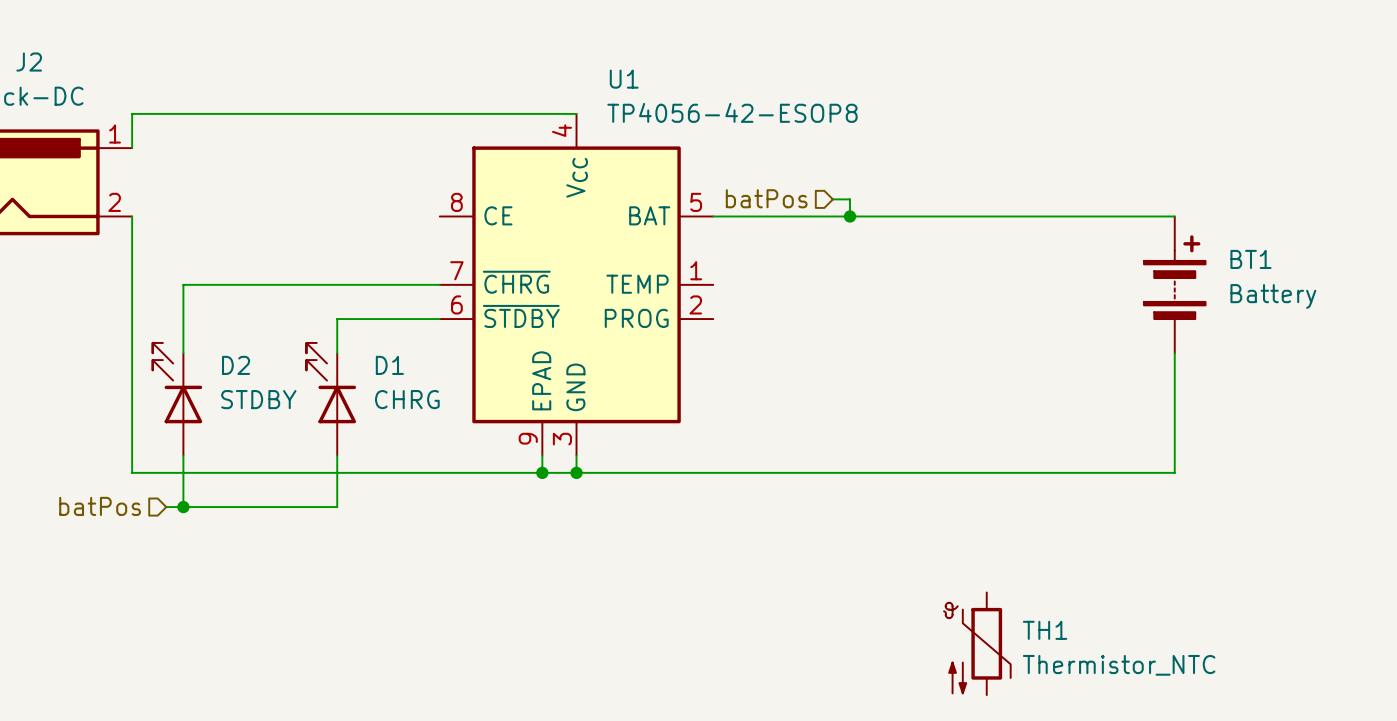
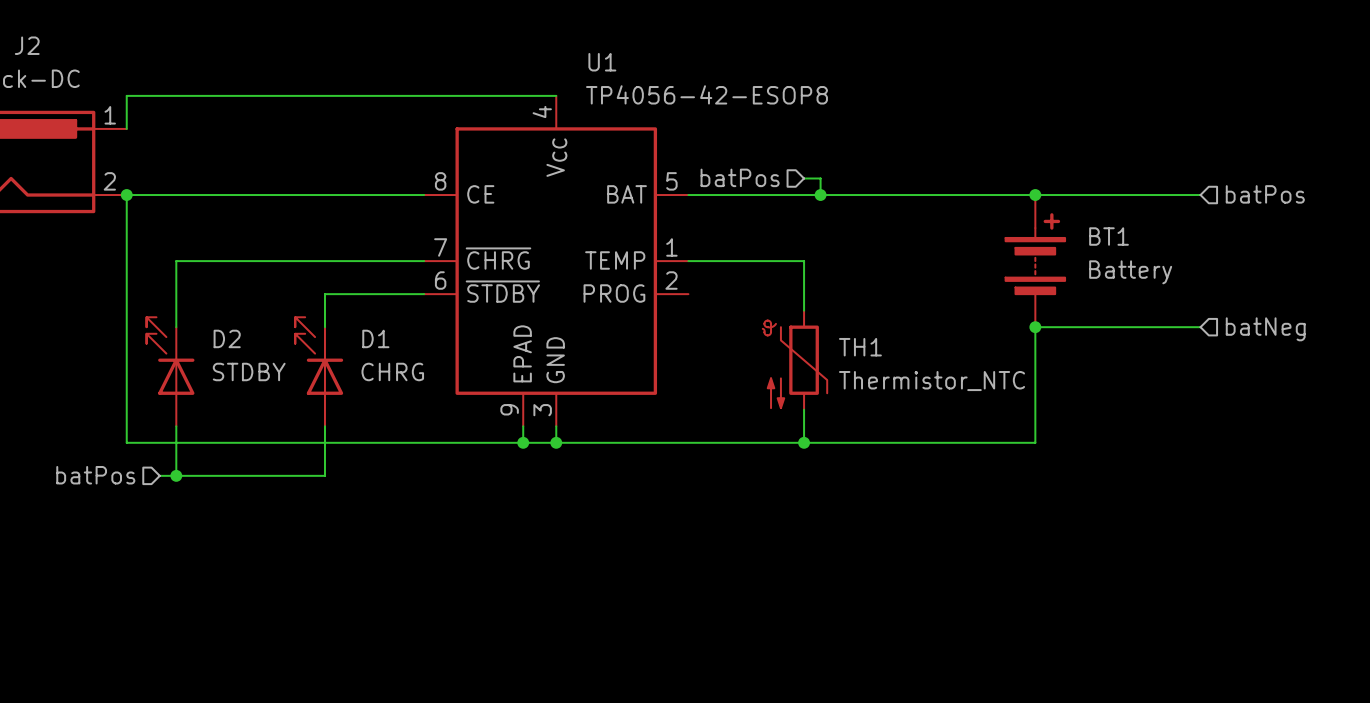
hierarchical label: none -> batPos (1265, 194)
wire: none -> (126, 195) (424, 195)
junction: none -> (126, 195)
junction: none -> (1035, 195)
wire: none -> (1134, 195) (1200, 195)
wire: none -> (688, 261) (804, 261) (804, 310)
BT1 position: (1174, 284) -> (1035, 261)
junction: none -> (1035, 327)
wire: (1174, 353) (1174, 472) (1072, 472) -> (1200, 327) (1035, 327) (1035, 442)
hierarchical label: none -> batNeg (1265, 329)
wire: none -> (804, 409) (804, 442)
junction: none -> (804, 442)
TH1 position: (977, 643) -> (794, 360)

